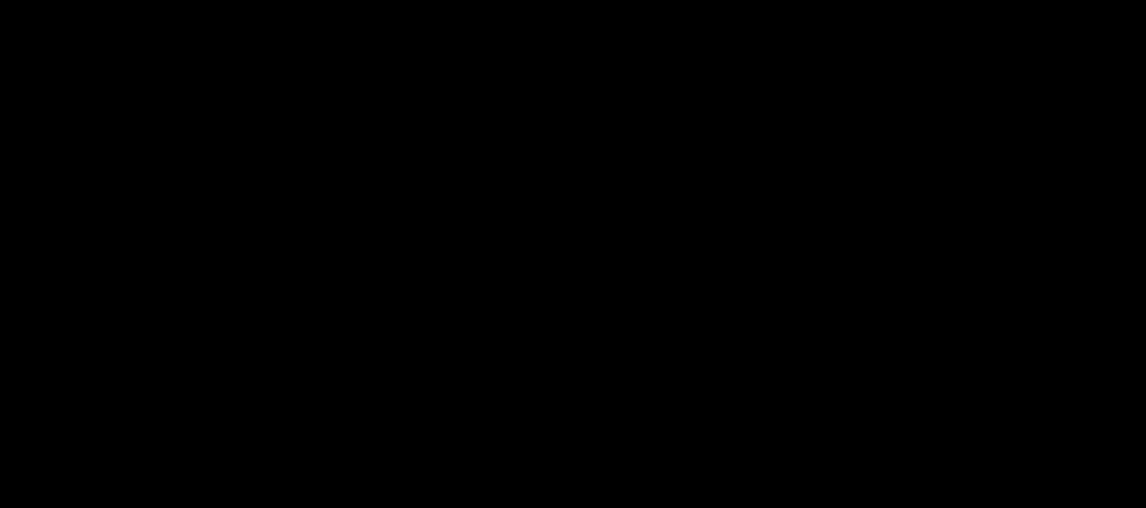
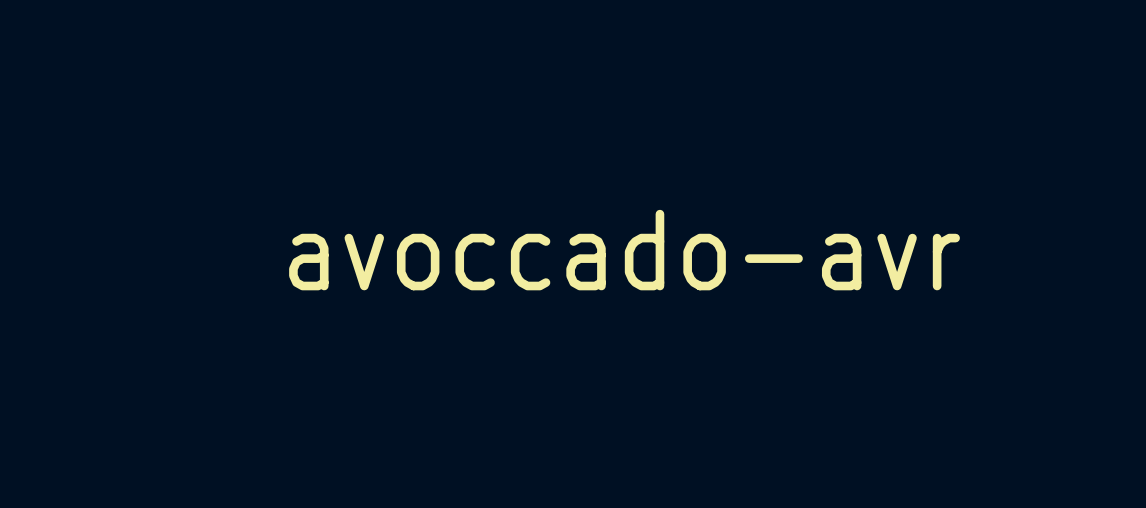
text: none -> avoccado-avr (624, 250)

